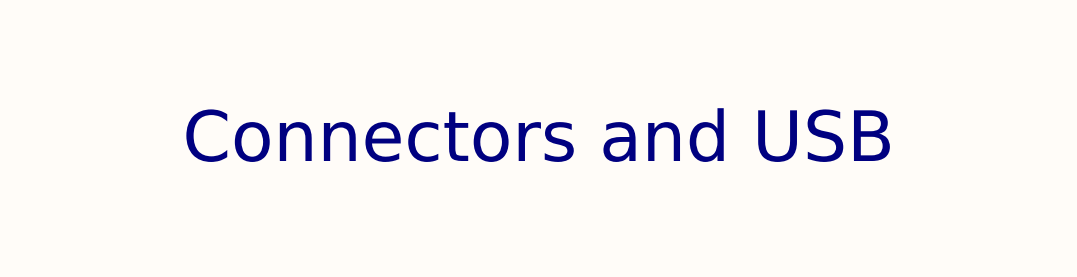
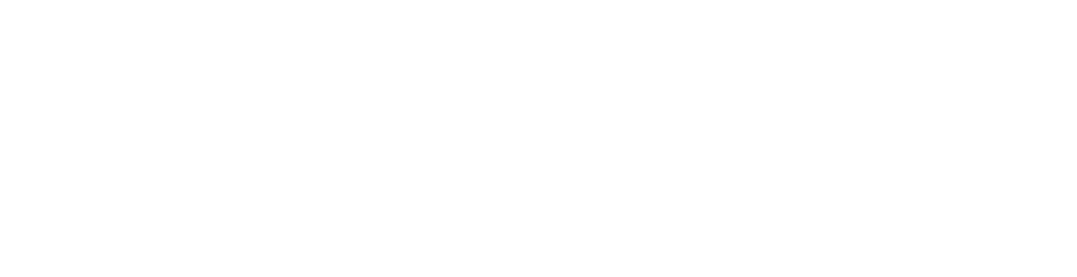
text: Connectors and USB (538, 135) -> none

